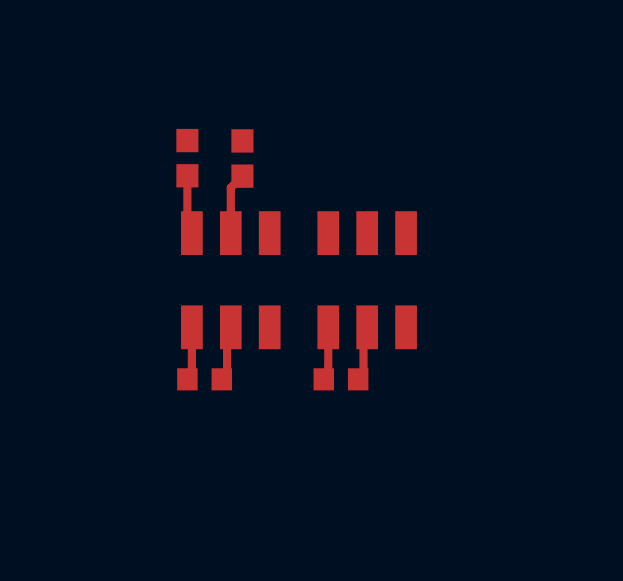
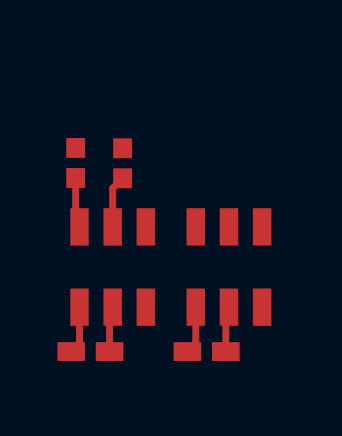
part footprint: [177, 368, 233, 391] -> [57, 342, 124, 361]
part footprint: [313, 368, 369, 391] -> [173, 342, 240, 361]

